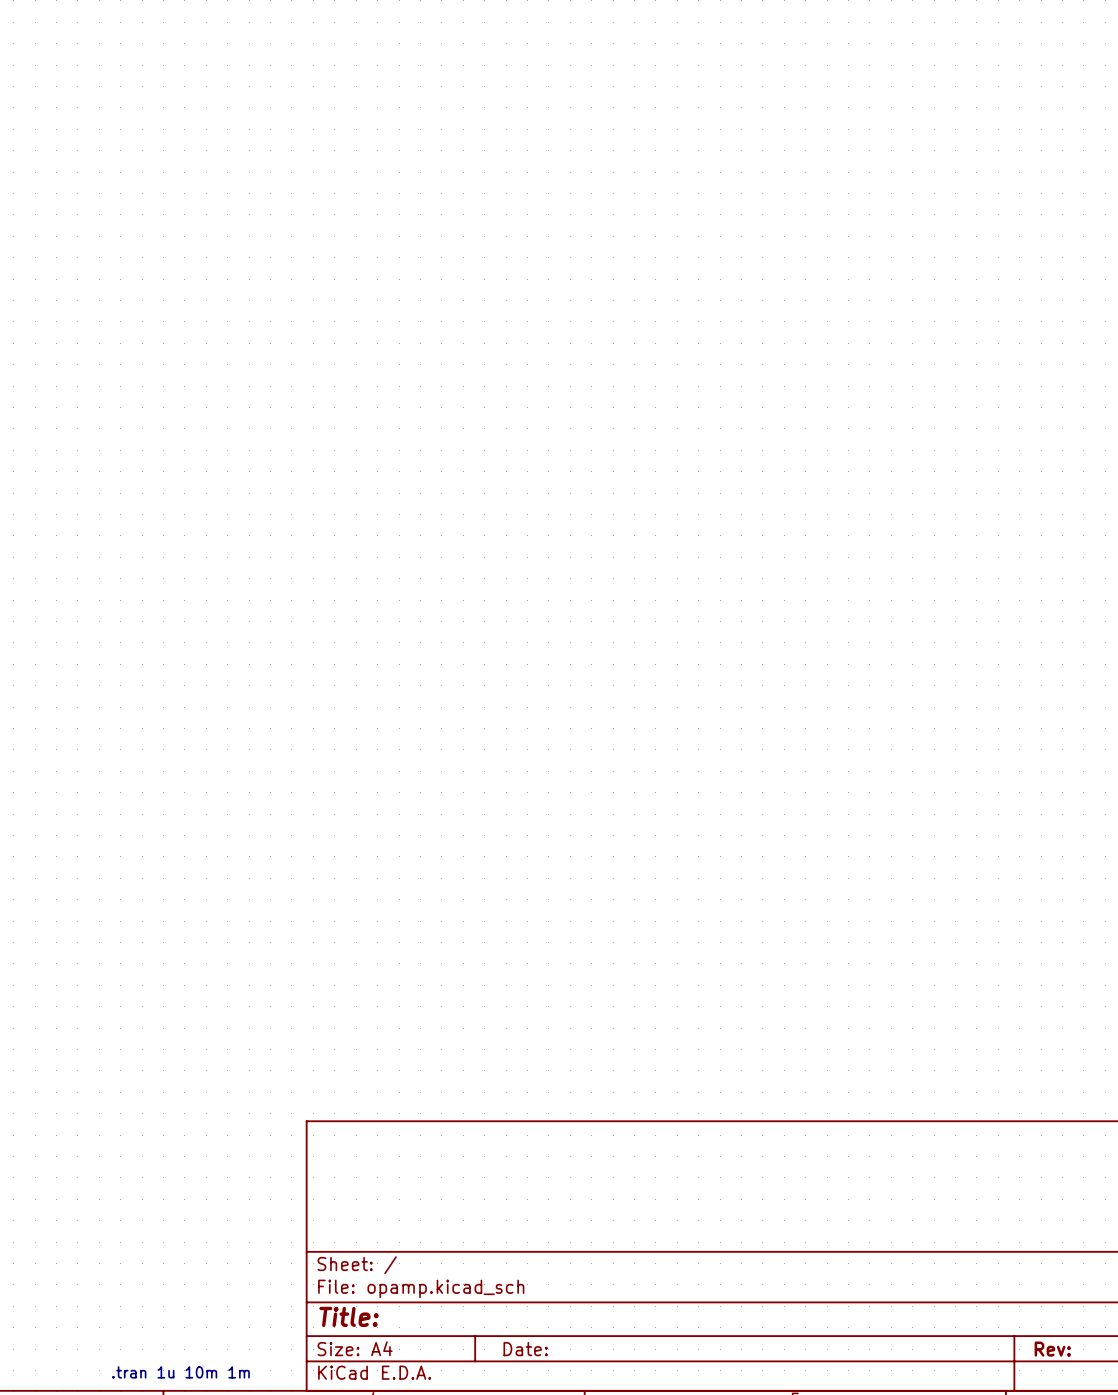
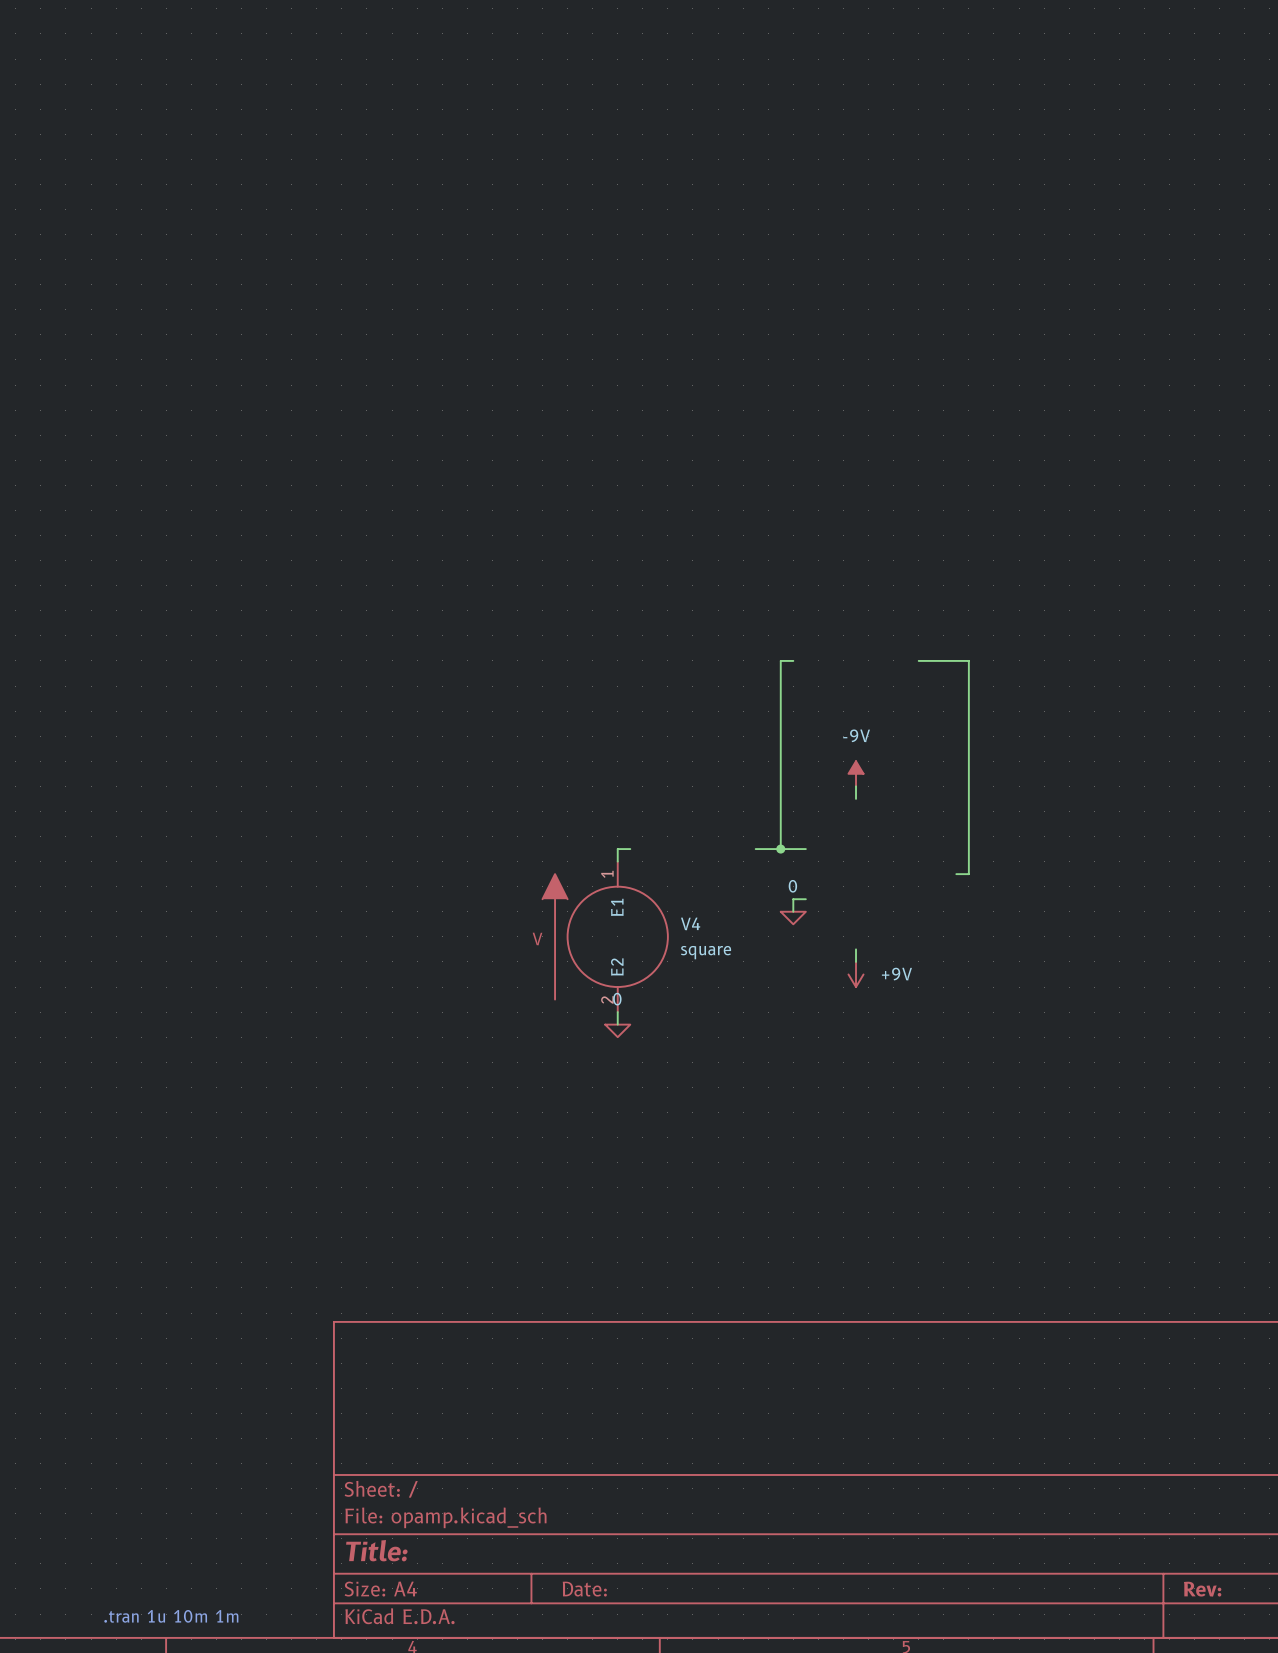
wire: none -> (793, 660) (780, 660) (780, 849)
wire: none -> (918, 660) (968, 660) (968, 874) (956, 874)
power symbol: none -> -9V (856, 773)
wire: none -> (856, 786) (856, 798)
wire: none -> (630, 849) (617, 849) (617, 861)
wire: none -> (755, 849) (805, 849)
junction: none -> (780, 849)
wire: none -> (805, 899) (793, 899) (793, 911)
power symbol: none -> 0 (793, 918)
V4: none -> square (605, 936)
wire: none -> (856, 949) (856, 961)
power symbol: none -> +9V (856, 974)
wire: none -> (617, 1012) (617, 1024)
power symbol: none -> 0 (617, 1030)

